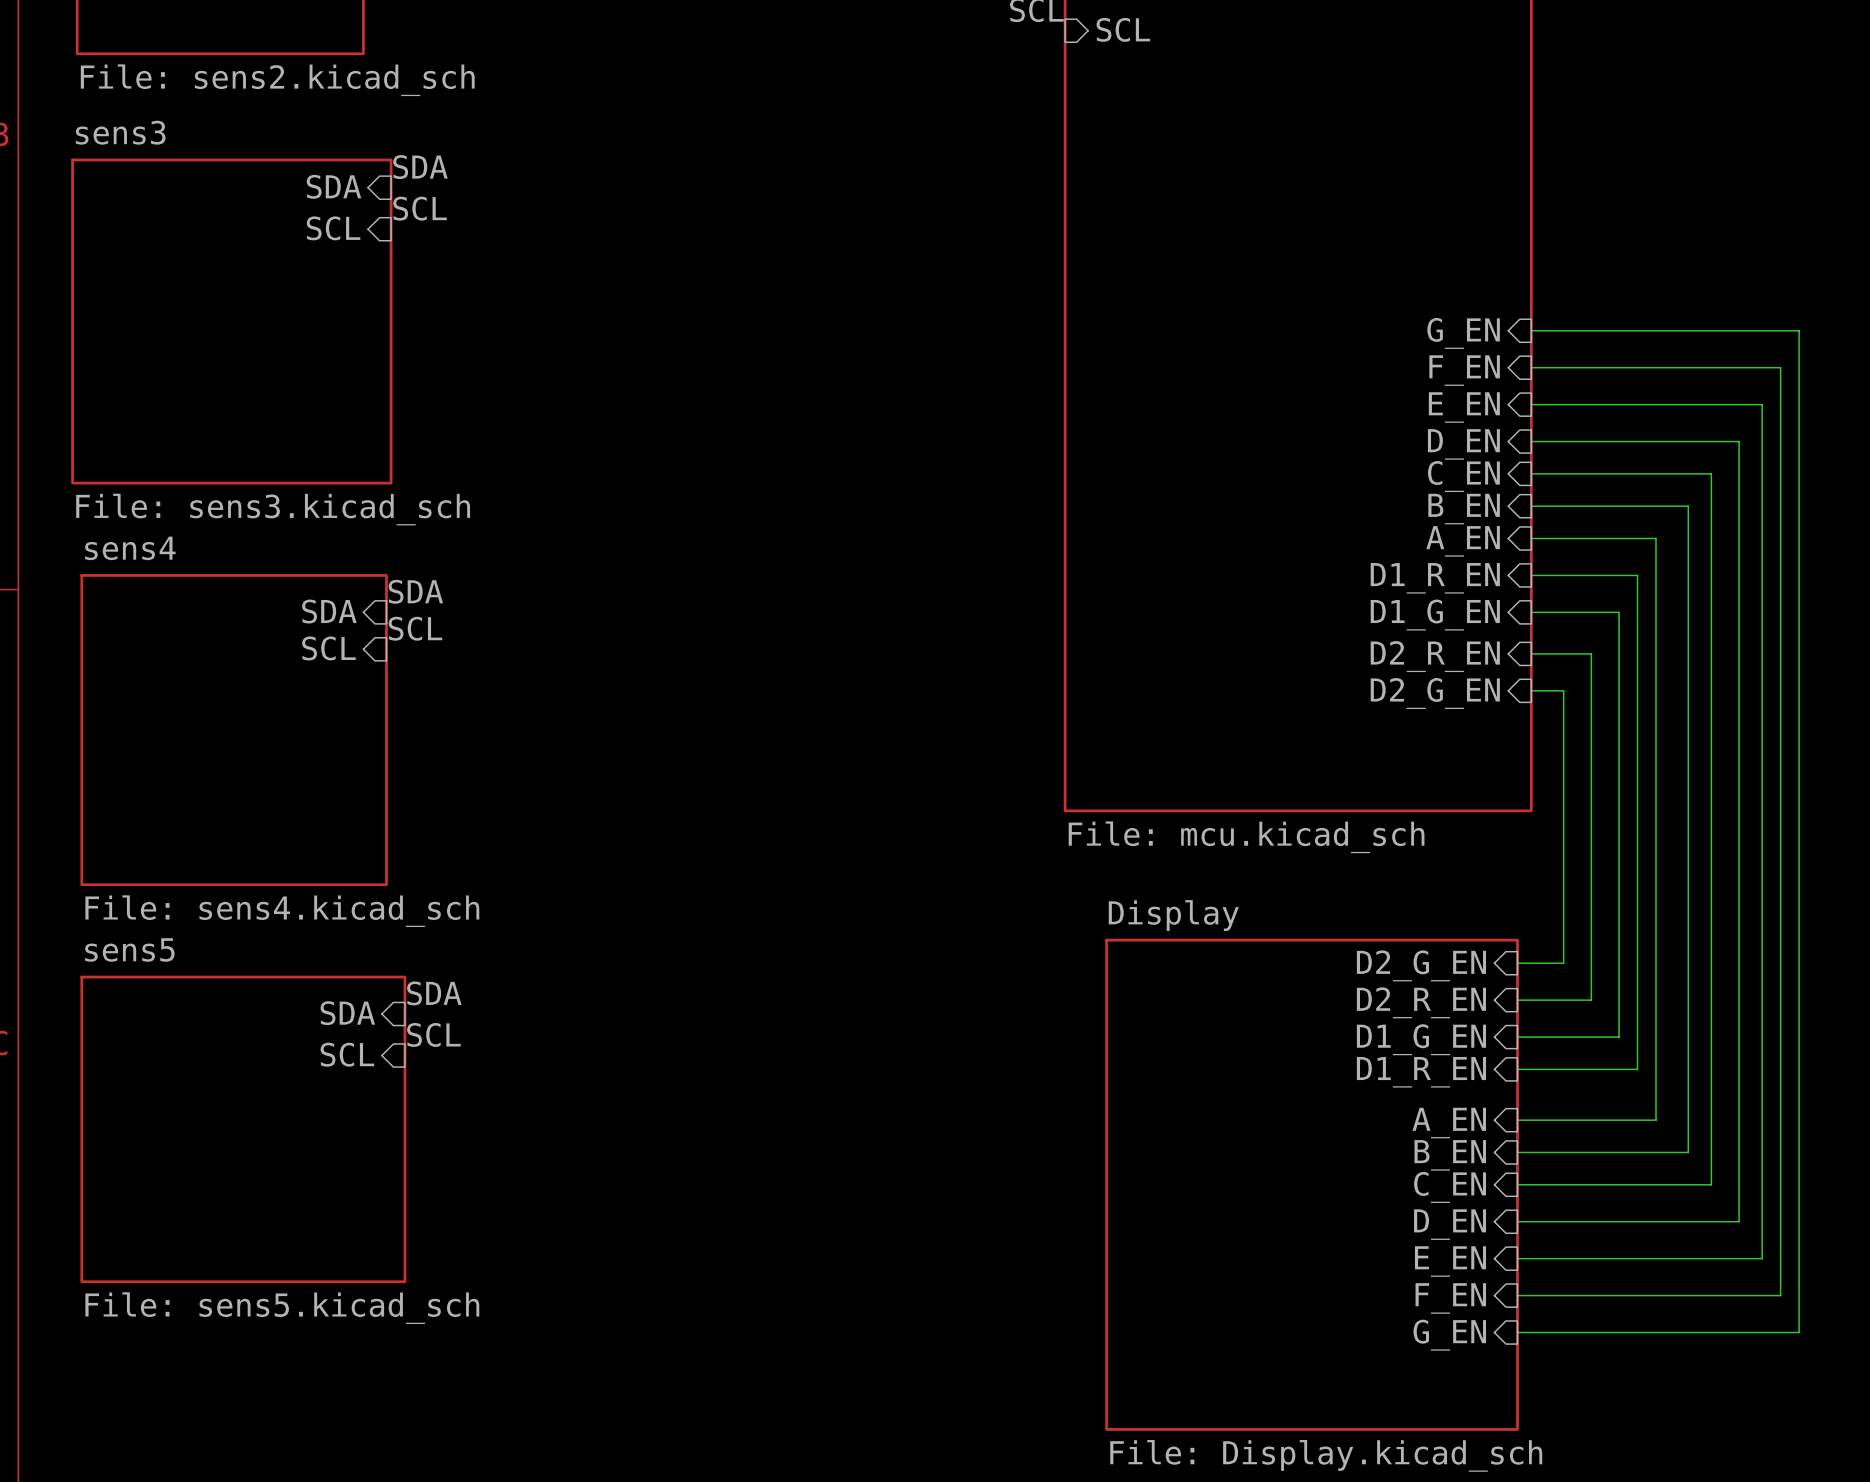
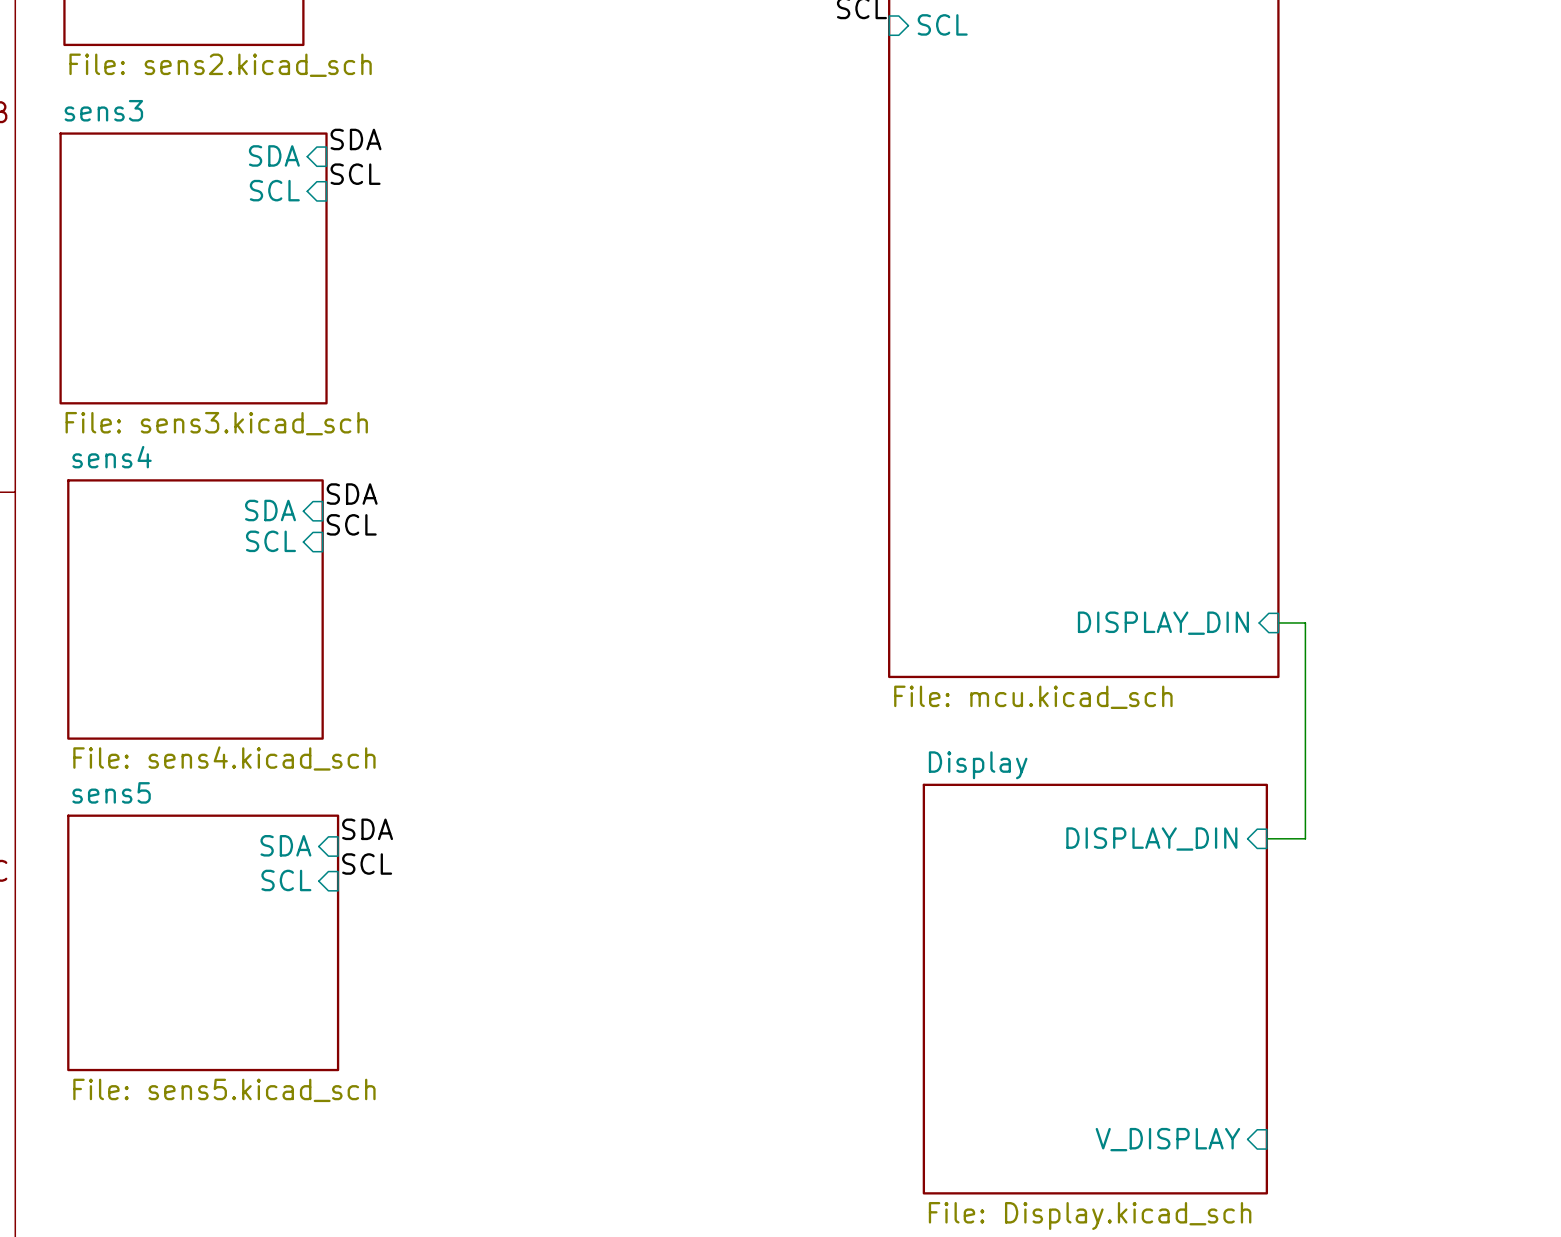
wire: (1531, 330) (1799, 330) (1799, 1332) (1517, 1332) -> none
sheet pin: G_EN (1463, 333) -> none
wire: (1531, 367) (1780, 367) (1780, 1295) (1517, 1295) -> none
sheet pin: F_EN (1464, 370) -> none
wire: (1531, 404) (1762, 404) (1762, 1258) (1517, 1258) -> none
sheet pin: E_EN (1464, 407) -> none
wire: (1531, 441) (1739, 441) (1739, 1221) (1517, 1221) -> none
sheet pin: D_EN (1463, 444) -> none
wire: (1531, 473) (1711, 473) (1711, 1184) (1517, 1184) -> none
sheet pin: C_EN (1463, 476) -> none
wire: (1531, 506) (1688, 506) (1688, 1152) (1517, 1152) -> none
sheet pin: B_EN (1464, 509) -> none
wire: (1531, 538) (1655, 538) (1655, 1120) (1517, 1120) -> none
sheet pin: A_EN (1463, 541) -> none
wire: (1531, 575) (1637, 575) (1637, 1069) (1517, 1069) -> none
sheet pin: D1_R_EN (1435, 578) -> none
wire: (1531, 612) (1619, 612) (1619, 1037) (1517, 1037) -> none
sheet pin: D1_G_EN (1435, 615) -> none
wire: (1531, 653) (1591, 653) (1591, 1000) (1517, 1000) -> none
sheet pin: D2_R_EN (1435, 656) -> none
wire: (1531, 690) (1563, 690) (1563, 746) -> (1278, 622) (1305, 622)
sheet pin: D2_G_EN (1435, 693) -> none
sheet pin: none -> DISPLAY_DIN (1163, 623)
wire: (1517, 963) (1563, 963) -> (1266, 838) (1305, 838) (1305, 804)
sheet pin: D2_G_EN (1421, 965) -> none
sheet pin: D2_R_EN (1421, 1002) -> DISPLAY_DIN (1151, 839)
sheet pin: D1_G_EN (1421, 1039) -> none
sheet pin: D1_R_EN (1421, 1072) -> none
sheet pin: A_EN (1449, 1123) -> none
sheet pin: B_EN (1450, 1155) -> none
sheet pin: C_EN (1450, 1187) -> none
sheet pin: D_EN (1450, 1224) -> none
sheet pin: E_EN (1450, 1261) -> none
sheet pin: F_EN (1450, 1298) -> none
sheet pin: G_EN (1449, 1335) -> none
sheet pin: none -> V_DISPLAY (1167, 1139)

